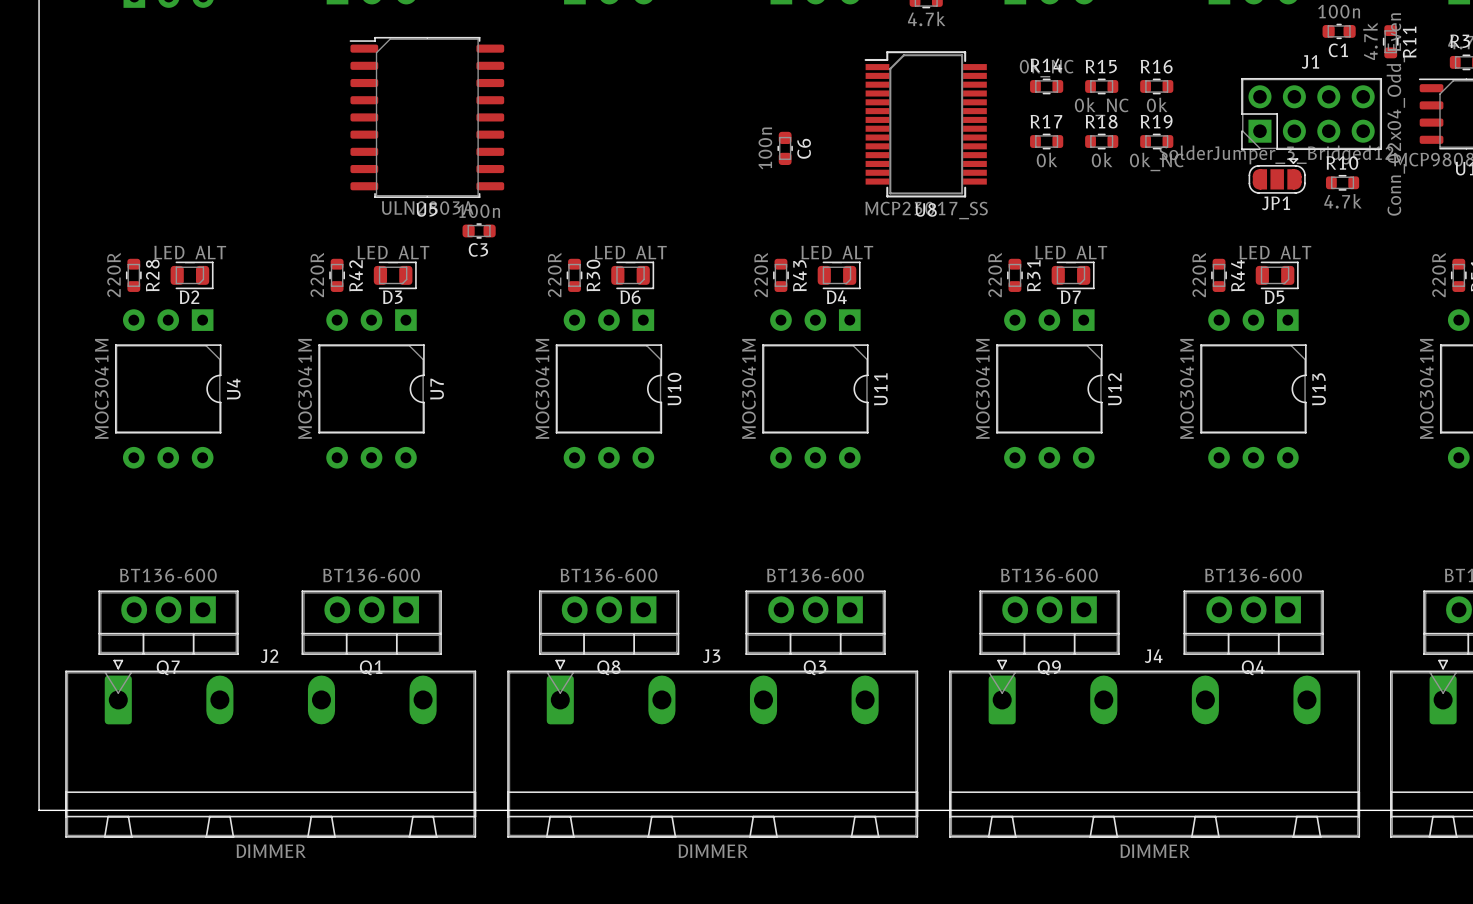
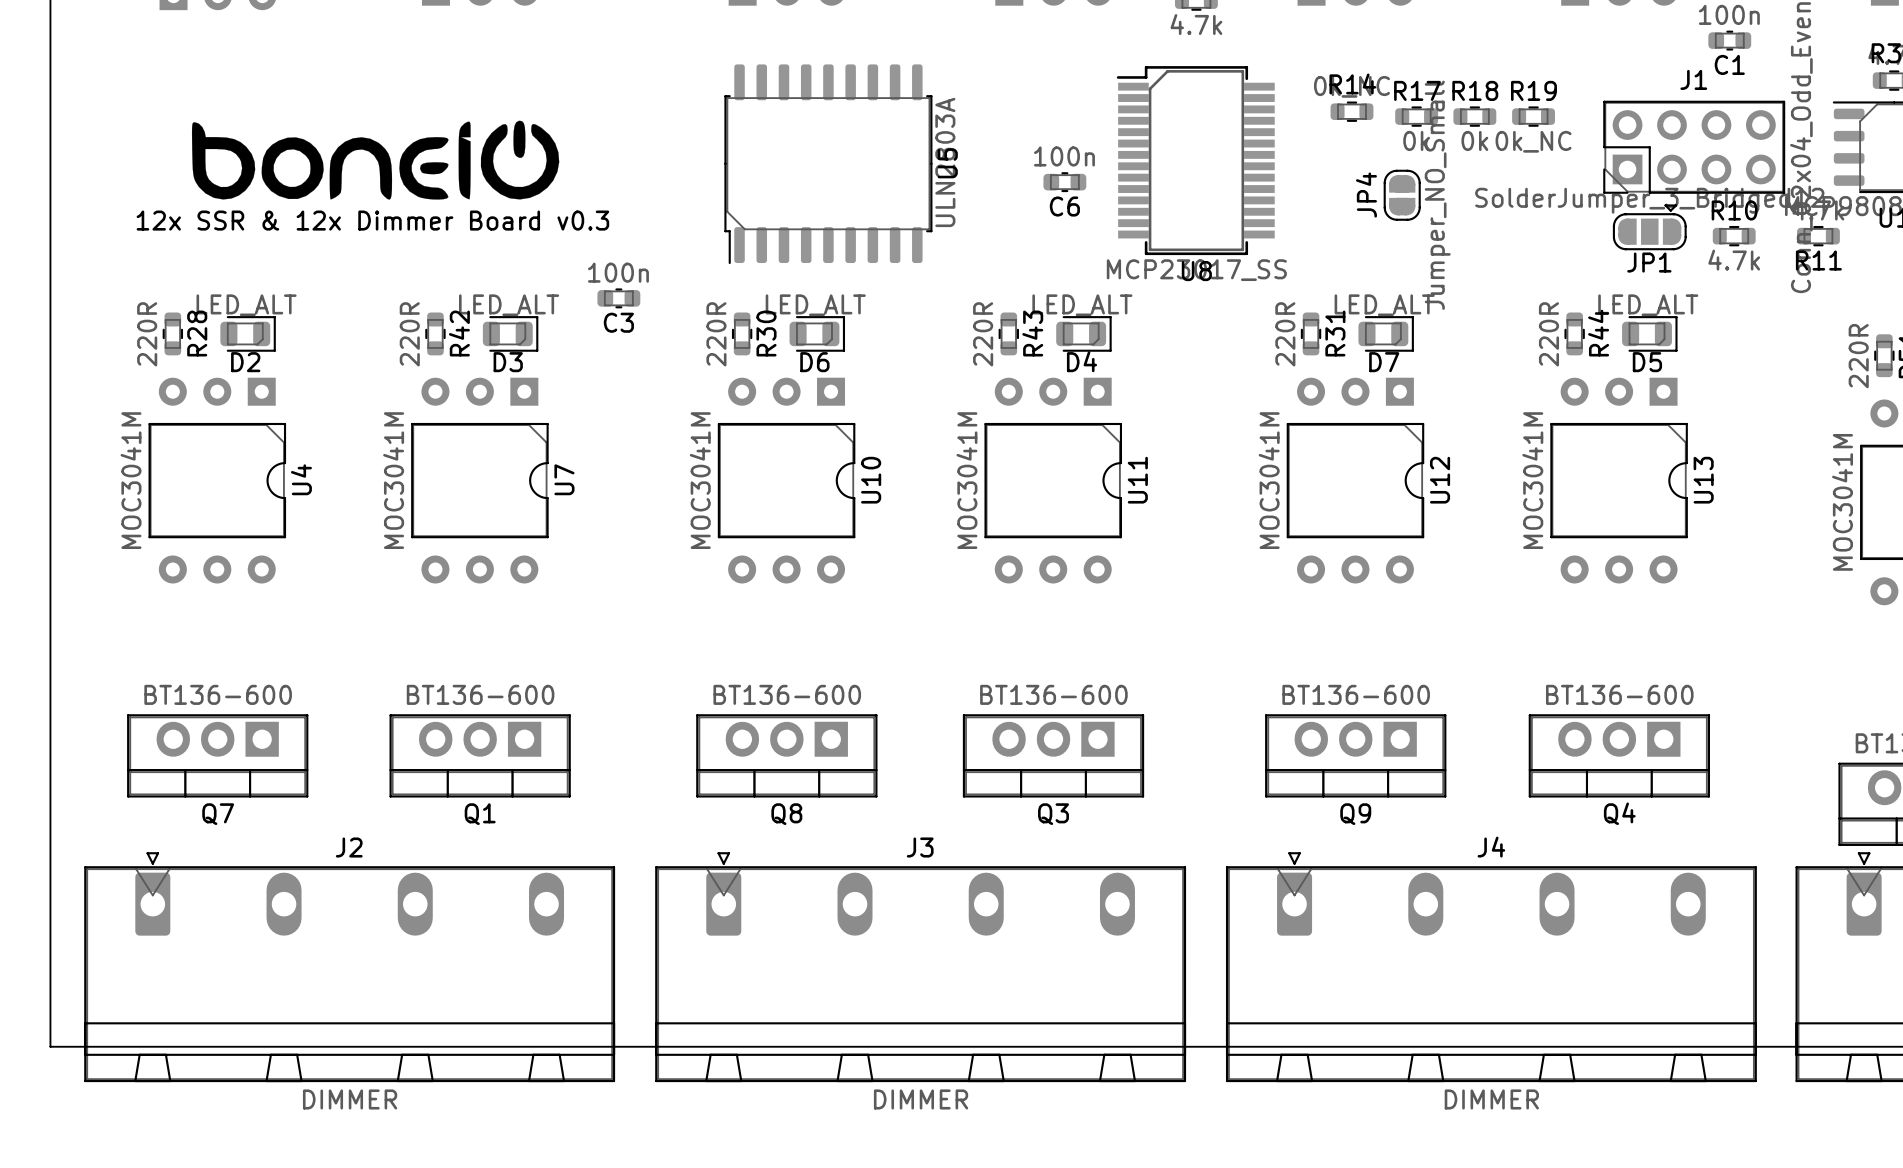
R11 rotation: 0° (1390, 41) -> 90° clockwise (1818, 236)
R11 position: (1390, 41) -> (1818, 236)
R15: 0k_NC (1101, 86) -> none
R16: 0k (1156, 86) -> none
drawing: none -> [191, 120, 560, 200]
U5 rotation: 0° (426, 117) -> 90° counterclockwise (828, 164)
U5 position: (426, 117) -> (828, 164)
R17 position: (1046, 141) -> (1416, 116)
R18 position: (1101, 141) -> (1474, 116)
R19 position: (1156, 141) -> (1533, 116)
C6 rotation: 0° (785, 148) -> 90° clockwise (1064, 182)
C6 position: (785, 148) -> (1064, 182)
JP4: none -> Jumper_NO_Small (1402, 195)
text: none -> 12x SSR & 12x Dimmer Board v0.3 (372, 220)
R28 position: (133, 275) -> (172, 333)
D2 position: (192, 275) -> (248, 333)
R42 position: (337, 275) -> (435, 333)
D3 position: (395, 275) -> (510, 333)
R30 position: (574, 275) -> (742, 333)
D6 position: (632, 275) -> (817, 333)
R43 position: (780, 275) -> (1008, 333)
D4 position: (839, 275) -> (1083, 333)
R31 position: (1014, 275) -> (1311, 333)
D7 position: (1073, 275) -> (1386, 333)
R44 position: (1219, 275) -> (1574, 333)
D5 position: (1277, 275) -> (1649, 333)
U4 position: (168, 388) -> (217, 480)
U7 position: (371, 388) -> (479, 480)
U10 position: (608, 388) -> (786, 480)
U11 position: (815, 388) -> (1053, 480)
U12 position: (1049, 388) -> (1355, 480)
U13 position: (1253, 388) -> (1619, 480)
Q7 position: (168, 622) -> (217, 755)
Q1 position: (371, 622) -> (480, 755)
Q8 position: (609, 622) -> (786, 755)
Q3 position: (815, 622) -> (1053, 755)
Q9 position: (1049, 622) -> (1355, 755)
Q4 position: (1253, 622) -> (1619, 755)

